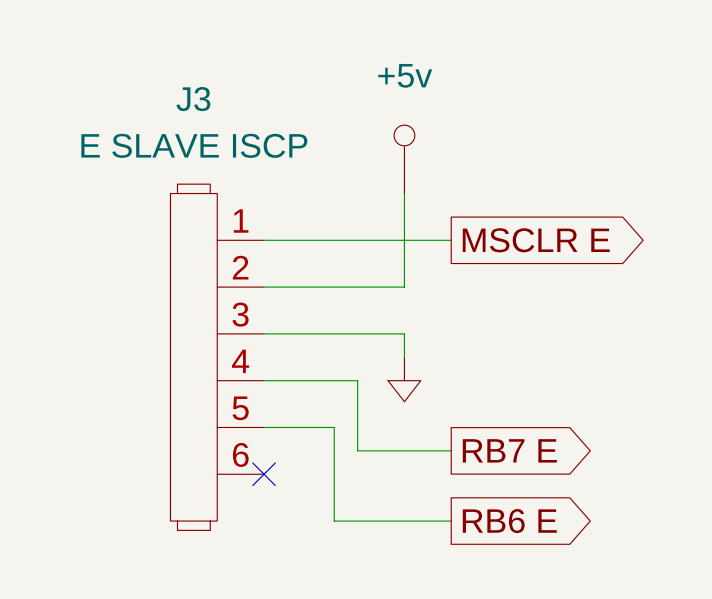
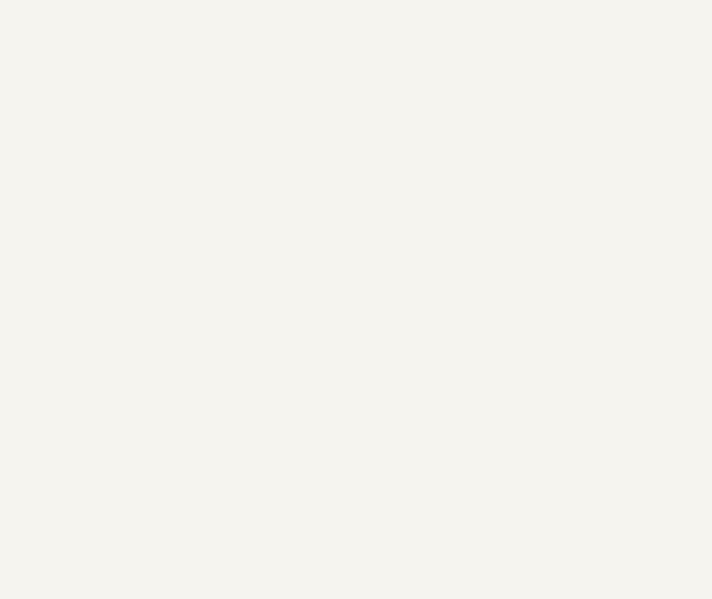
power symbol: +5v (404, 159) -> none
wire: (404, 193) (404, 287) (264, 287) -> none
wire: (264, 240) (451, 240) -> none
global label: MSCLR E (536, 240) -> none
wire: (264, 333) (404, 333) (404, 357) -> none
J3: E SLAVE ISCP (217, 357) -> none
power symbol: (404, 379) -> none
wire: (264, 380) (357, 380) (357, 450) (451, 450) -> none
wire: (264, 427) (334, 427) (334, 521) (451, 521) -> none
global label: RB7 E (509, 450) -> none
no-connect mark: (264, 474) -> none
global label: RB6 E (509, 521) -> none

